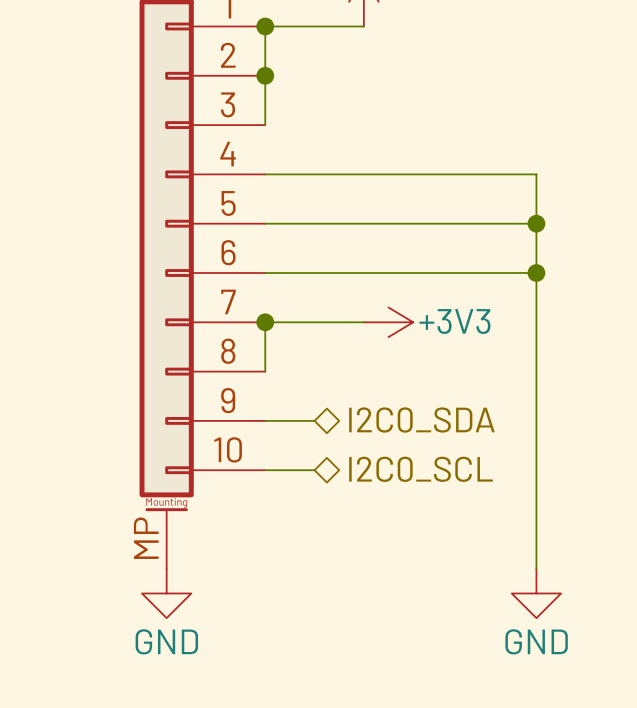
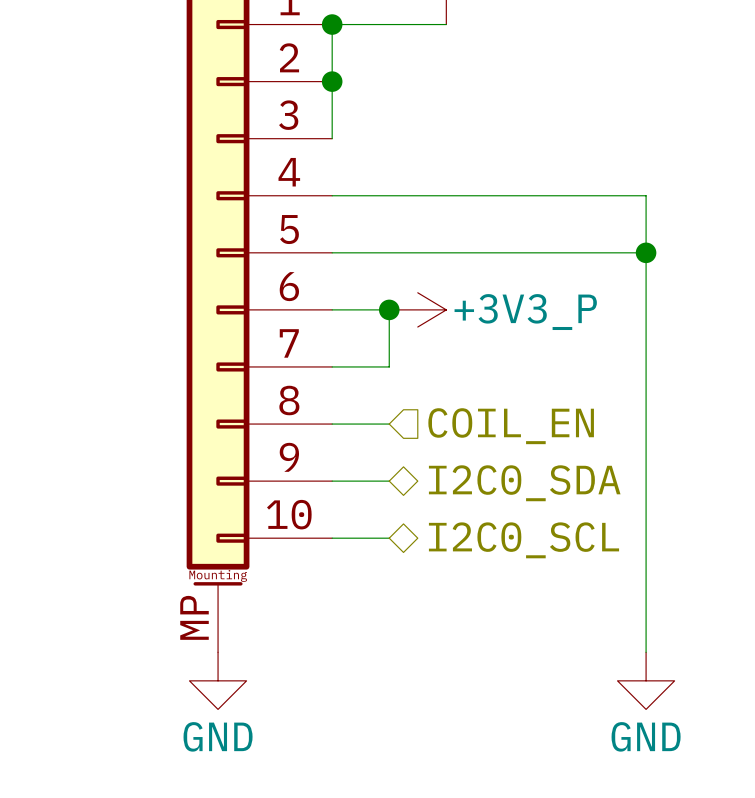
wire: (314, 273) (536, 273) -> none
power symbol: none -> +3V3_P (417, 309)
junction: (536, 273) -> none
wire: (265, 322) (265, 371) -> (389, 424) (332, 424)
junction position: (265, 322) -> (389, 309)
wire: (314, 322) (363, 322) -> (389, 366) (389, 309)
power symbol: +3V3 (388, 322) -> none
hierarchical label: none -> COIL_EN (511, 426)

